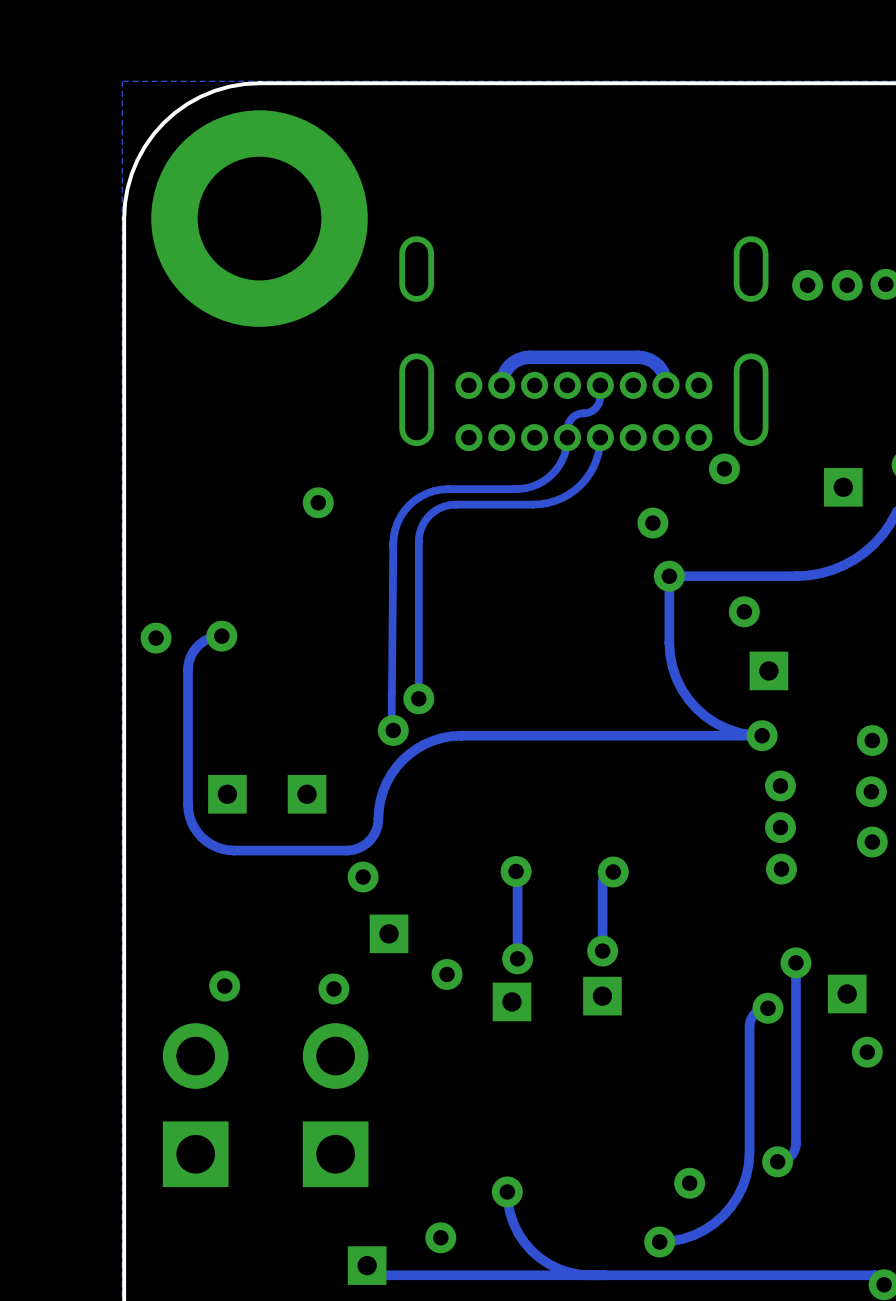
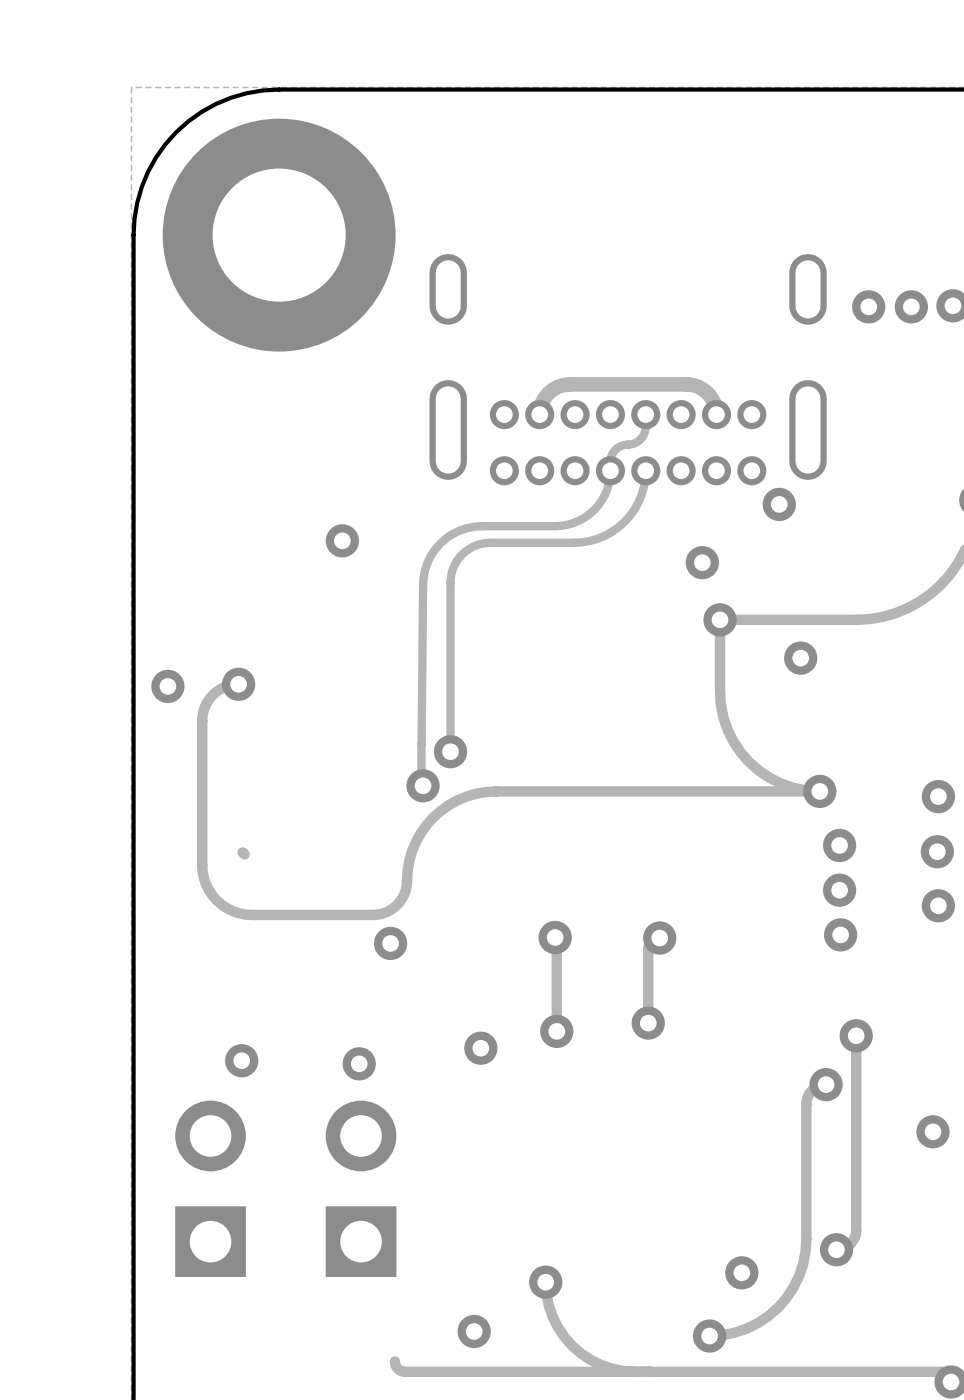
part: (843, 487) -> none
part: (768, 670) -> none
part: (227, 794) -> none
part: (307, 794) -> none
part: (389, 933) -> none
part: (847, 993) -> none
part: (602, 996) -> none
part: (511, 1001) -> none
part: (367, 1265) -> none

